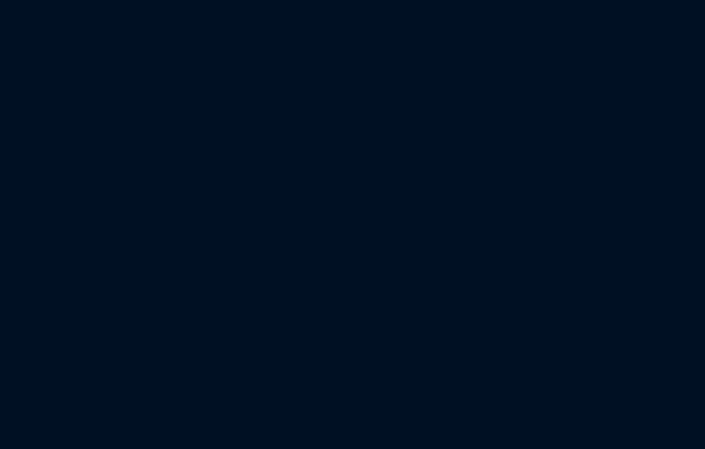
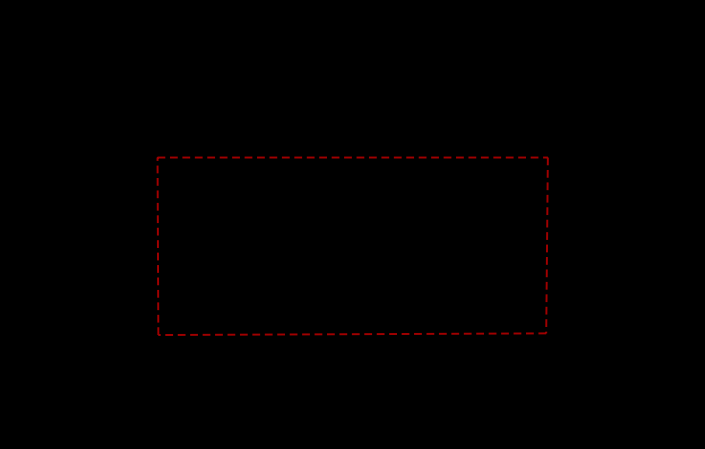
zone outline: none -> (157, 157) (158, 335) (546, 333) (547, 157) (157, 157)

